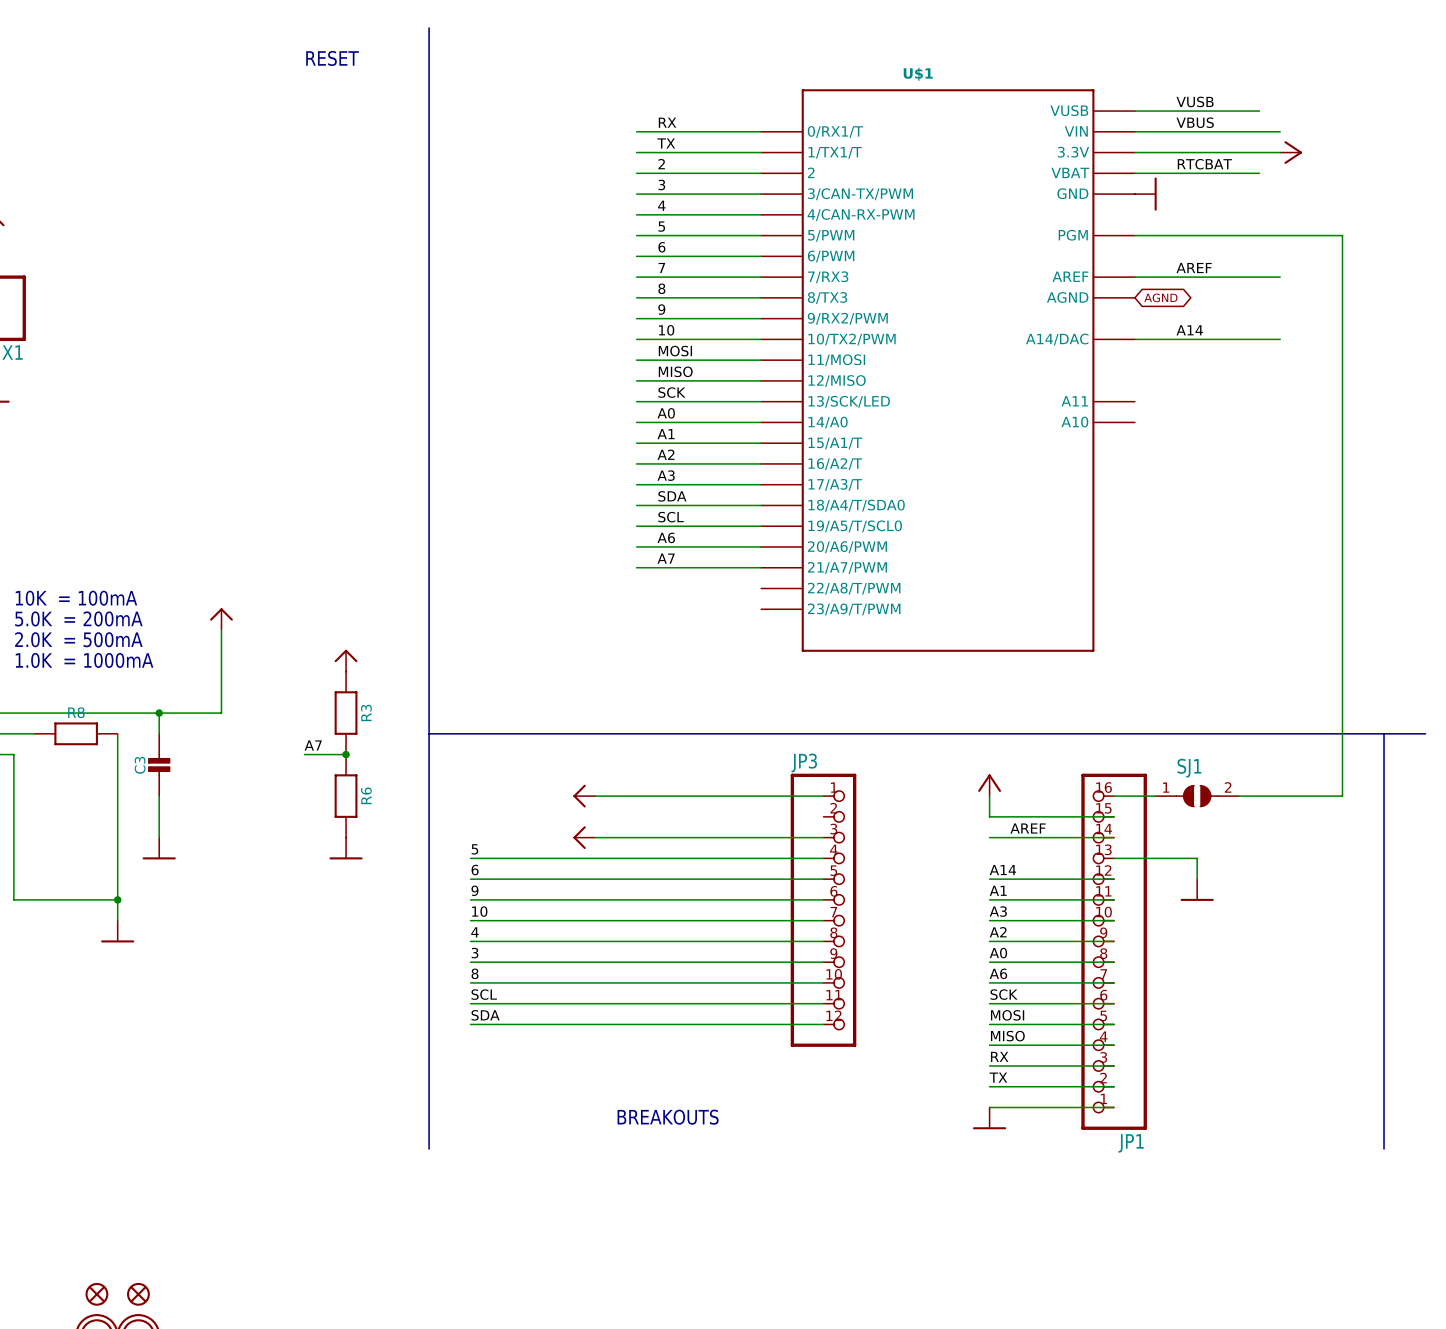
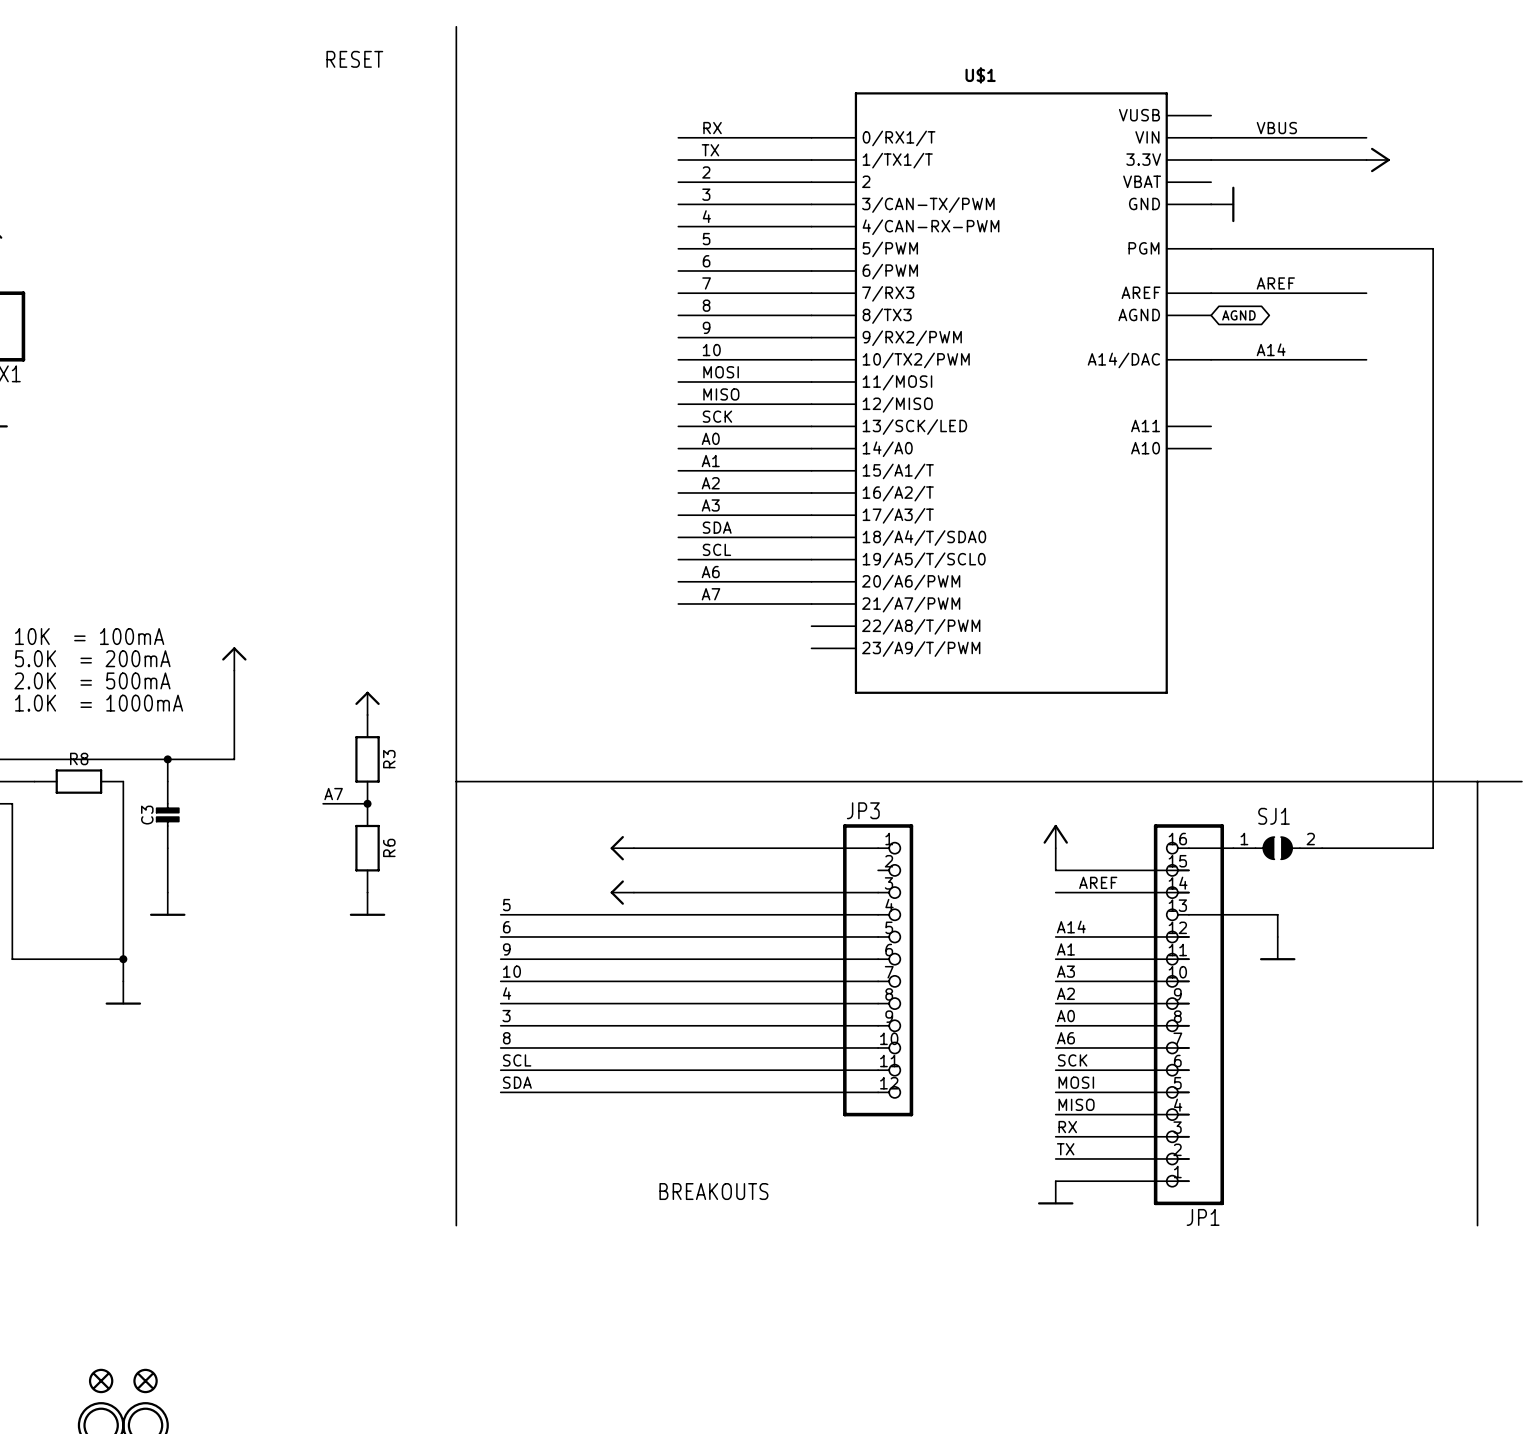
label: VUSB (1195, 101) -> none
wire: (1134, 111) (1259, 111) -> none
label: RTCBAT (1204, 164) -> none
wire: (1134, 173) (1259, 173) -> none

